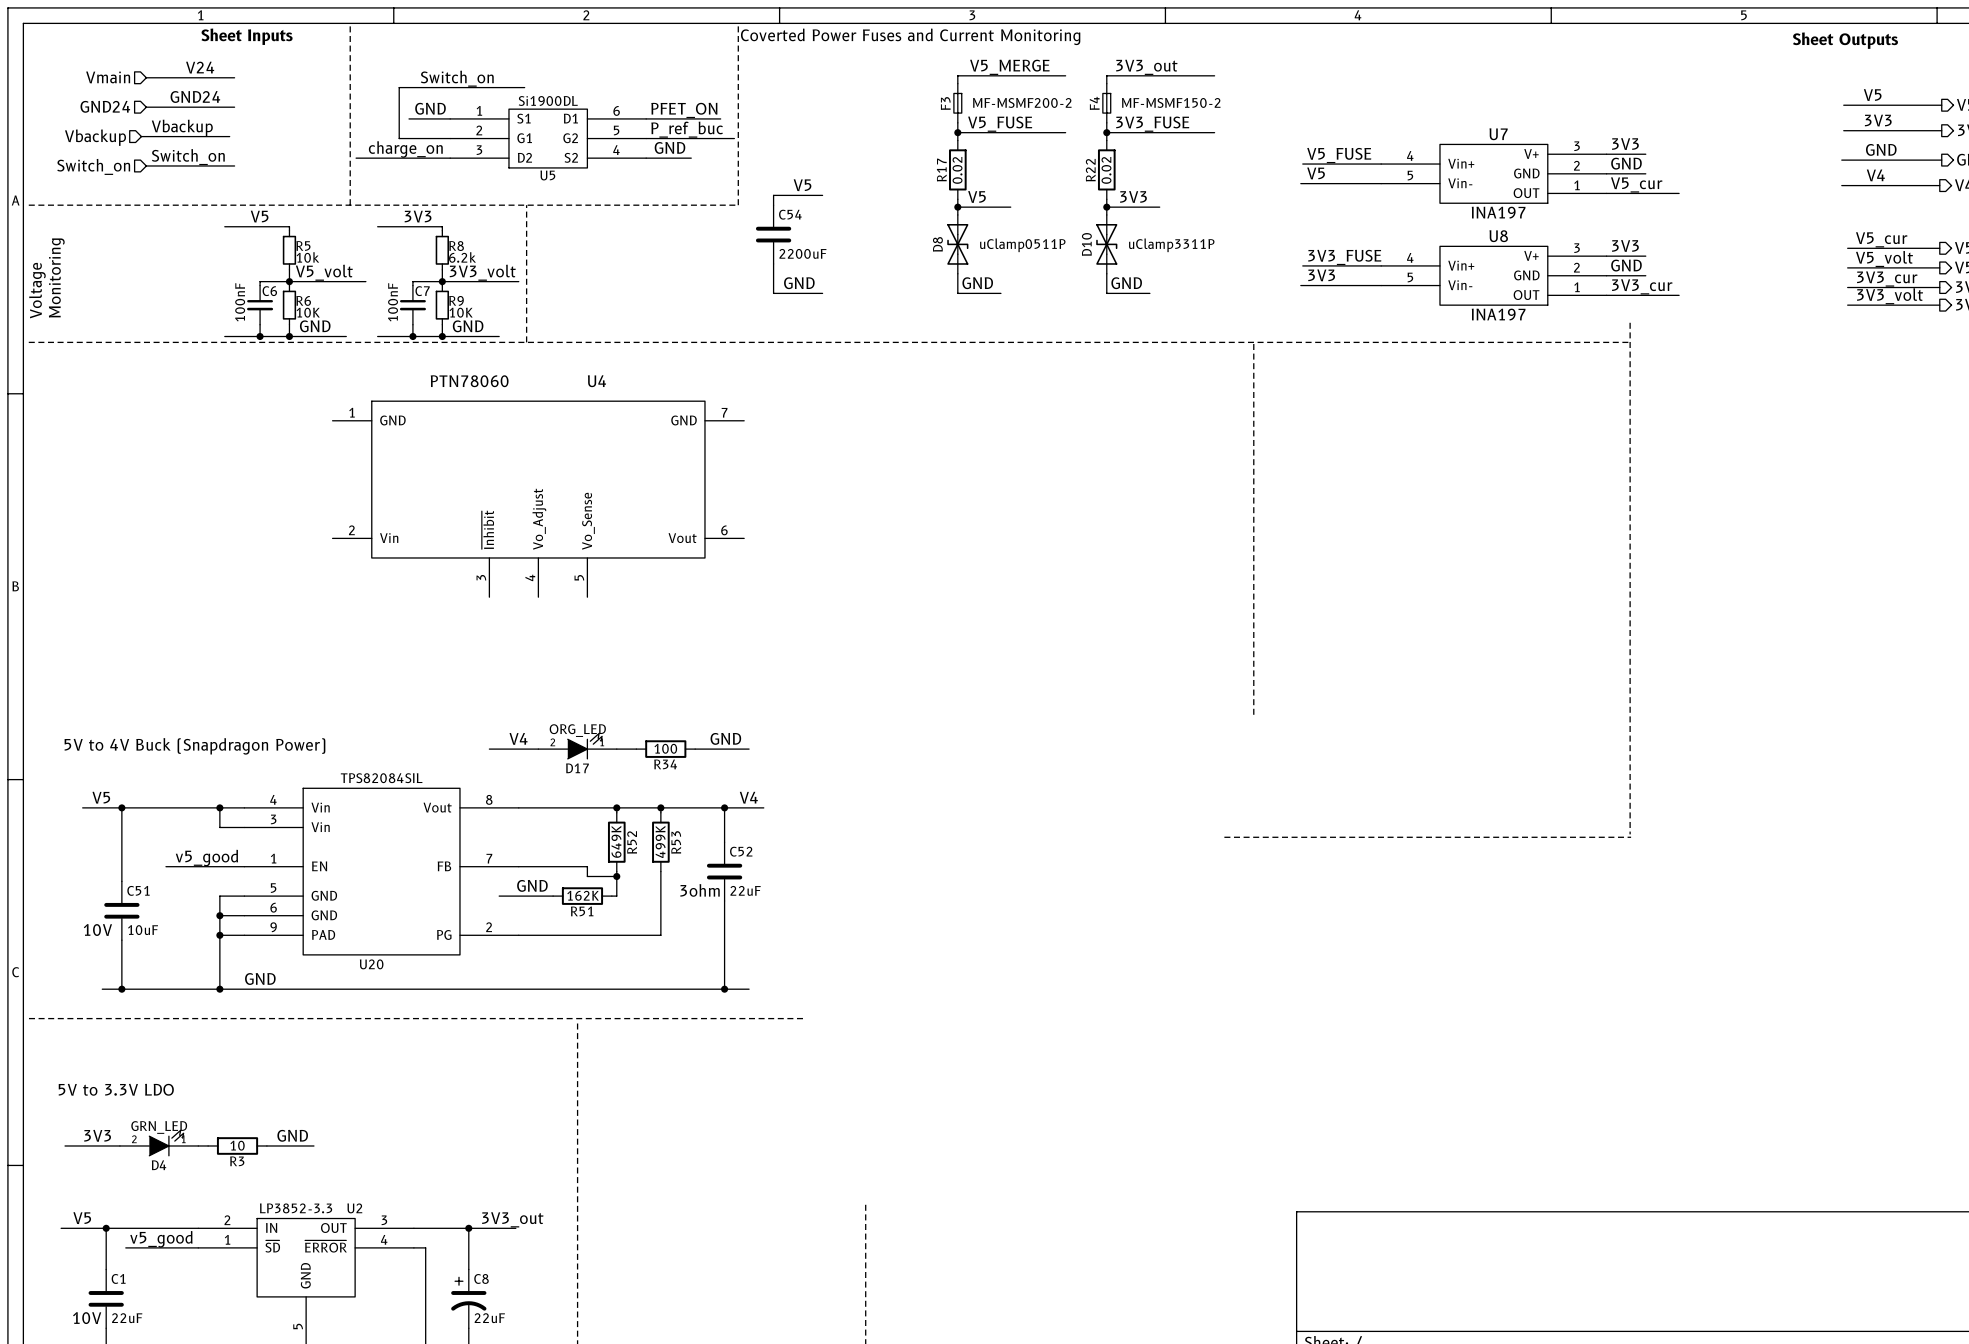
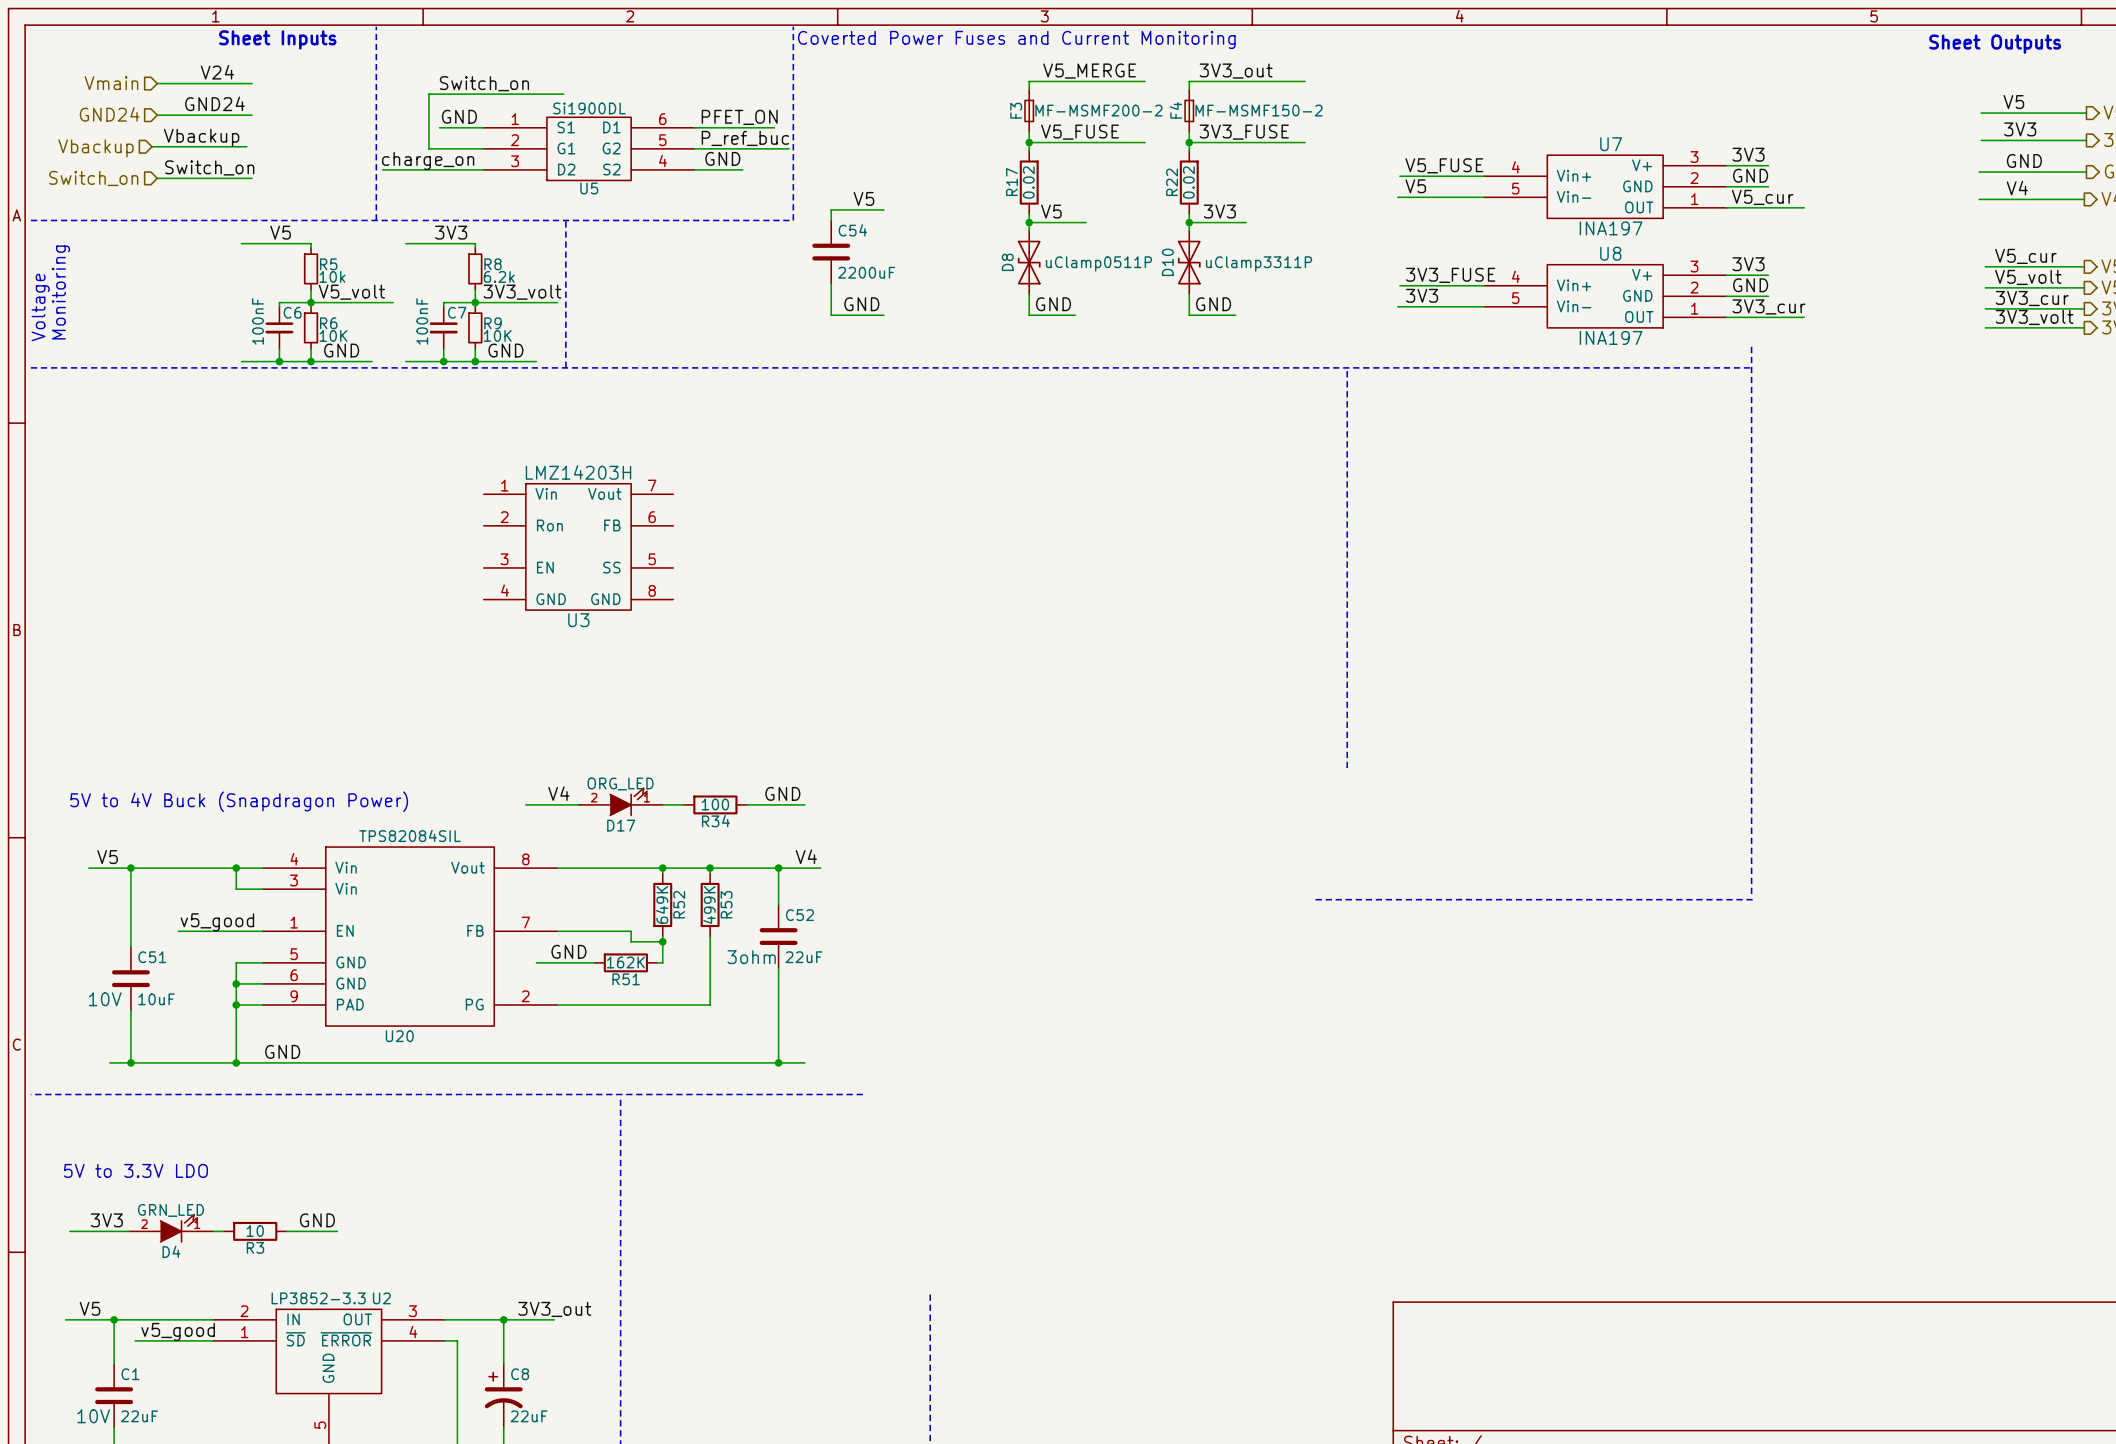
U4: PTN78060 (538, 499) -> none
U3: none -> LMZ14203H (578, 546)

